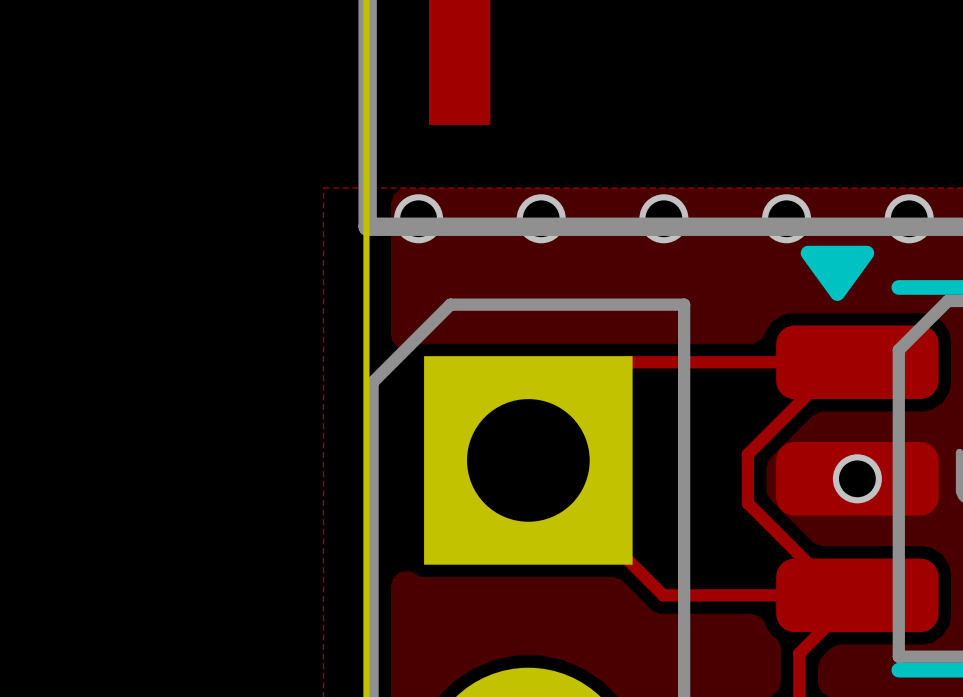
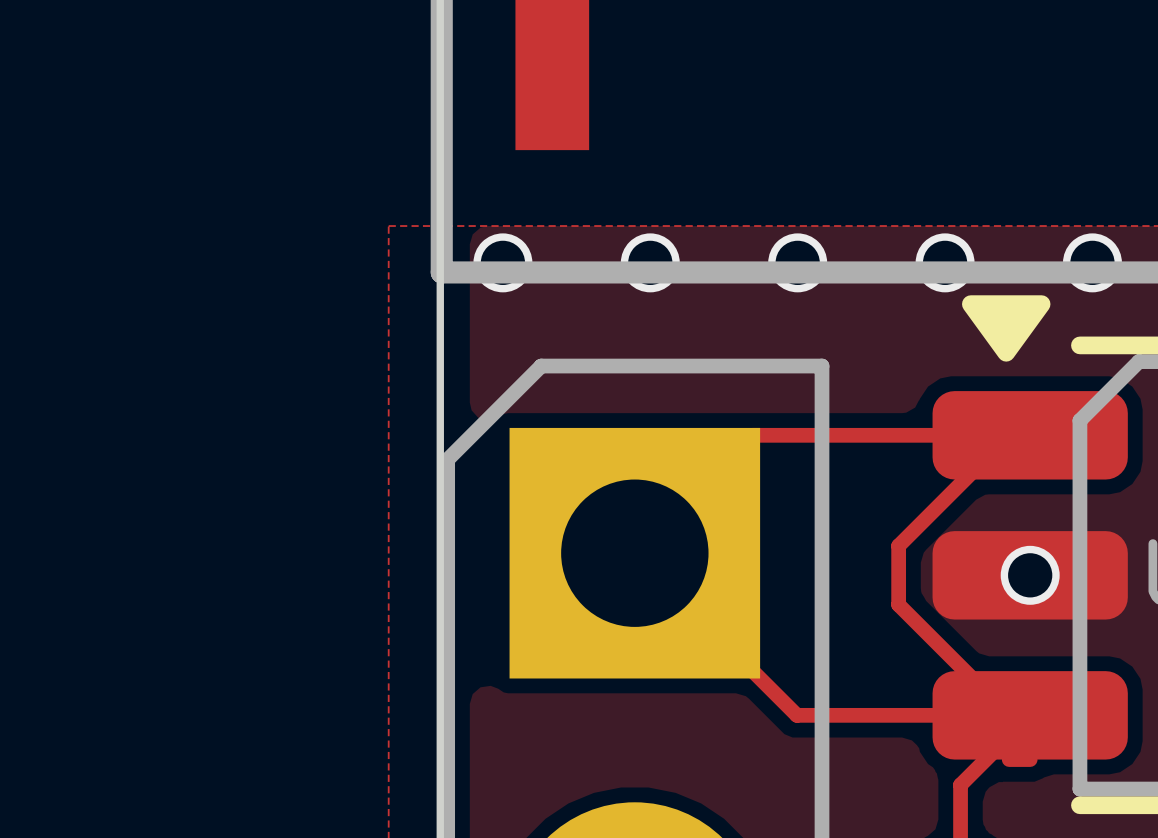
track: none -> (1009, 759) (1030, 759)

